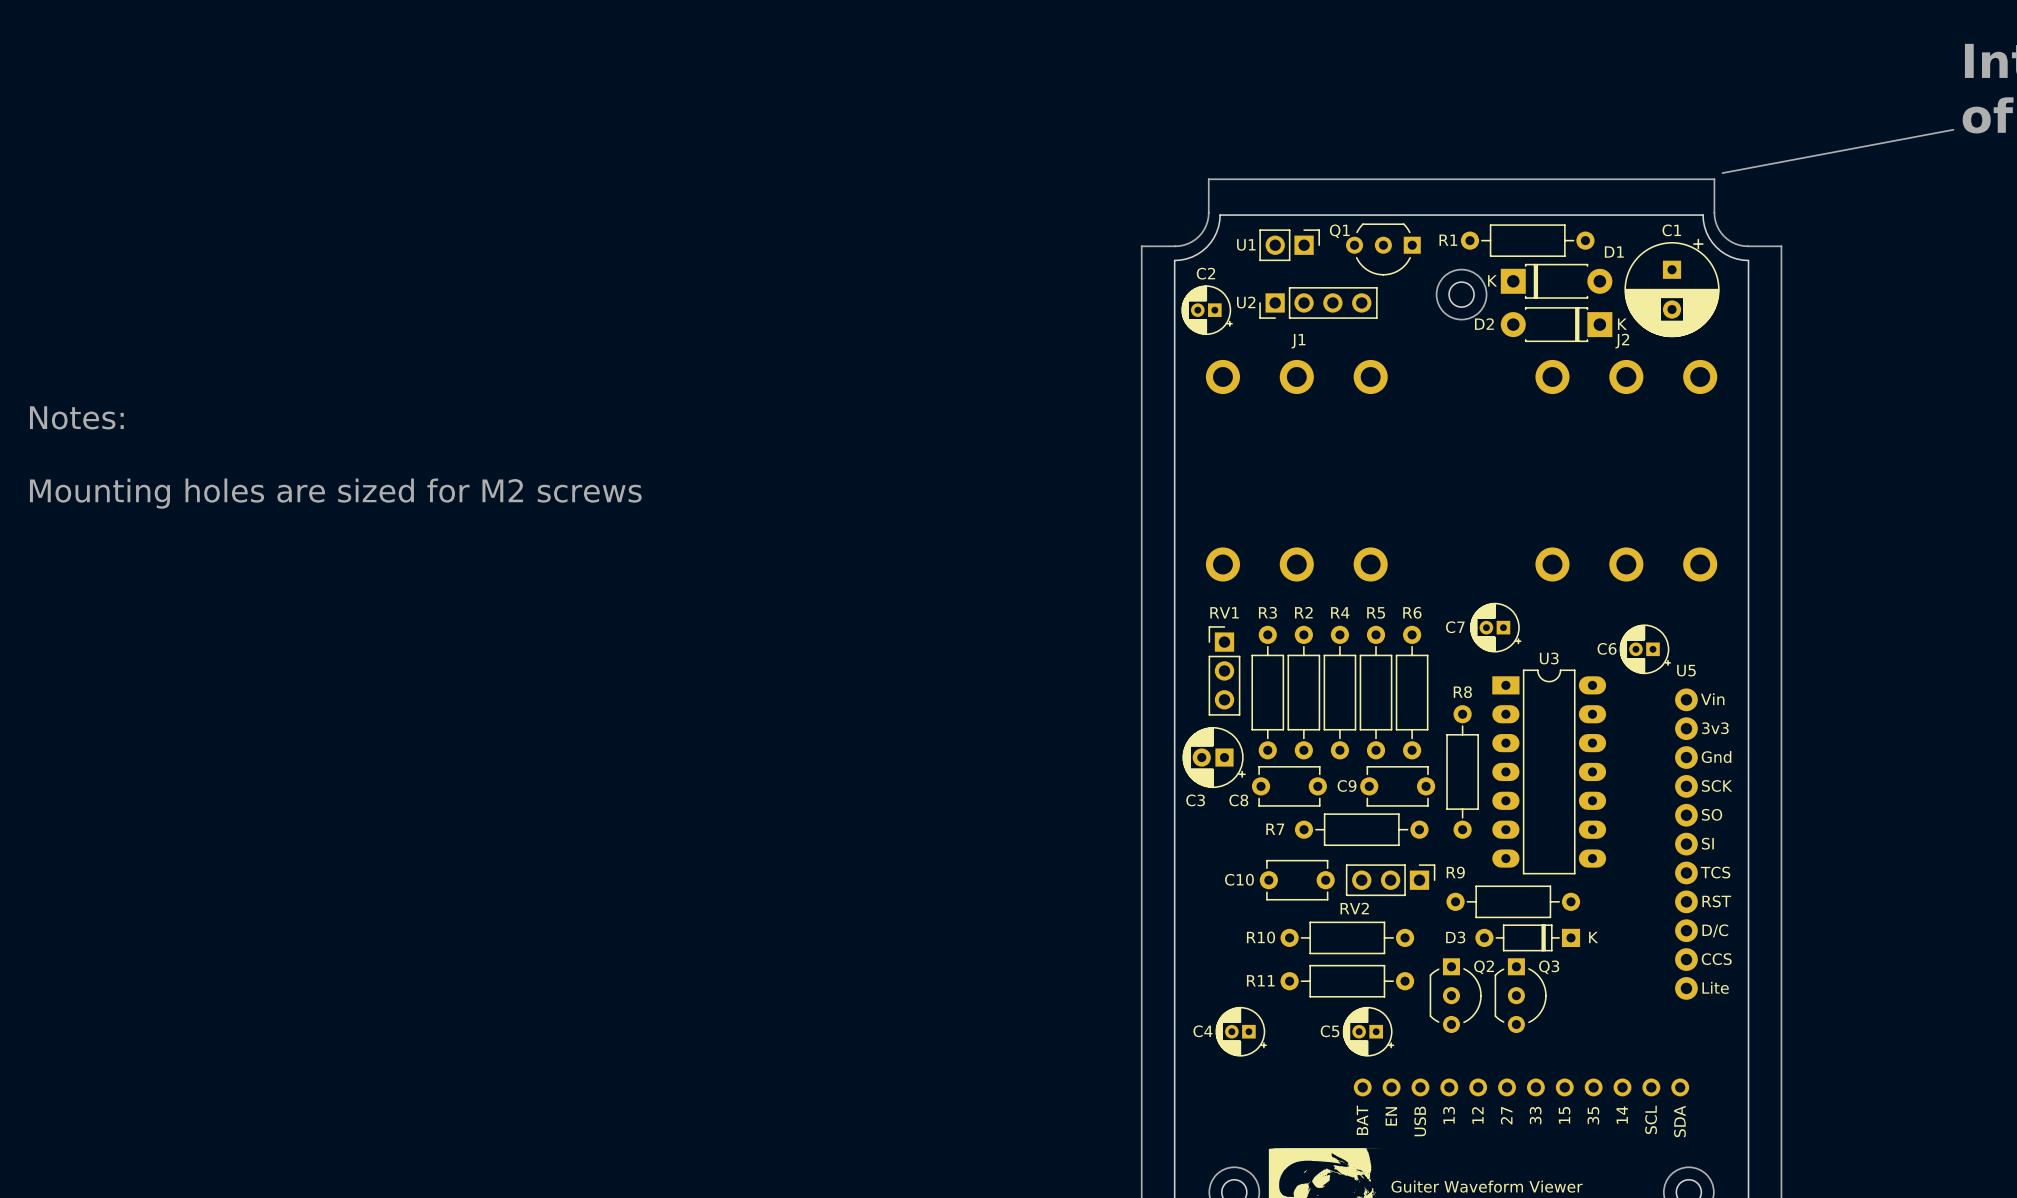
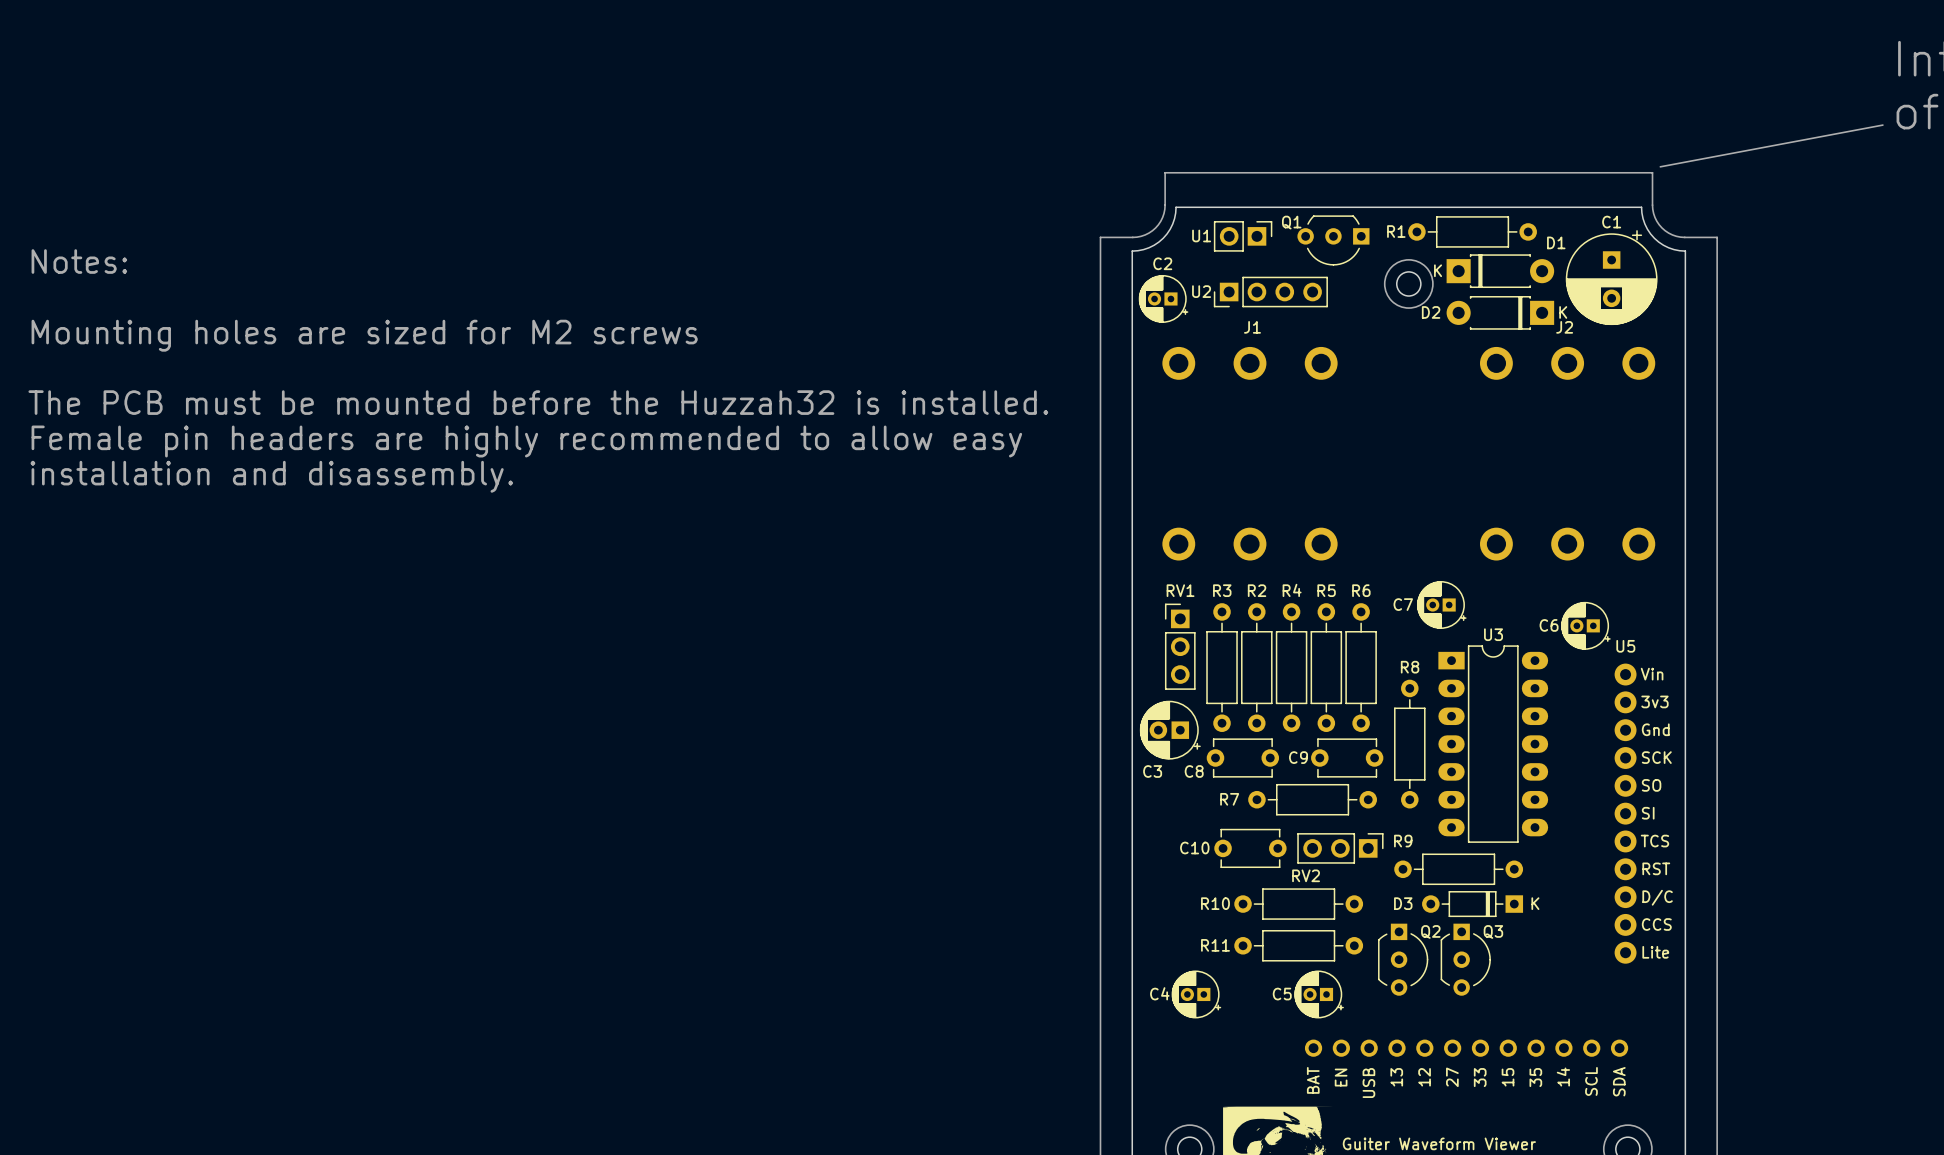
text: none -> Notes: (79, 261)
text: none -> Mounting holes are sized for M2 screws (364, 335)
text: Notes: (76, 417) -> The PCB must be mounted before the Huzzah32 is installed. (538, 402)
text: none -> Female pin headers are highly recommended to allow easy (526, 441)
text: Mounting holes are sized for M2 screws (335, 493) -> installation and disassembly. (271, 476)

